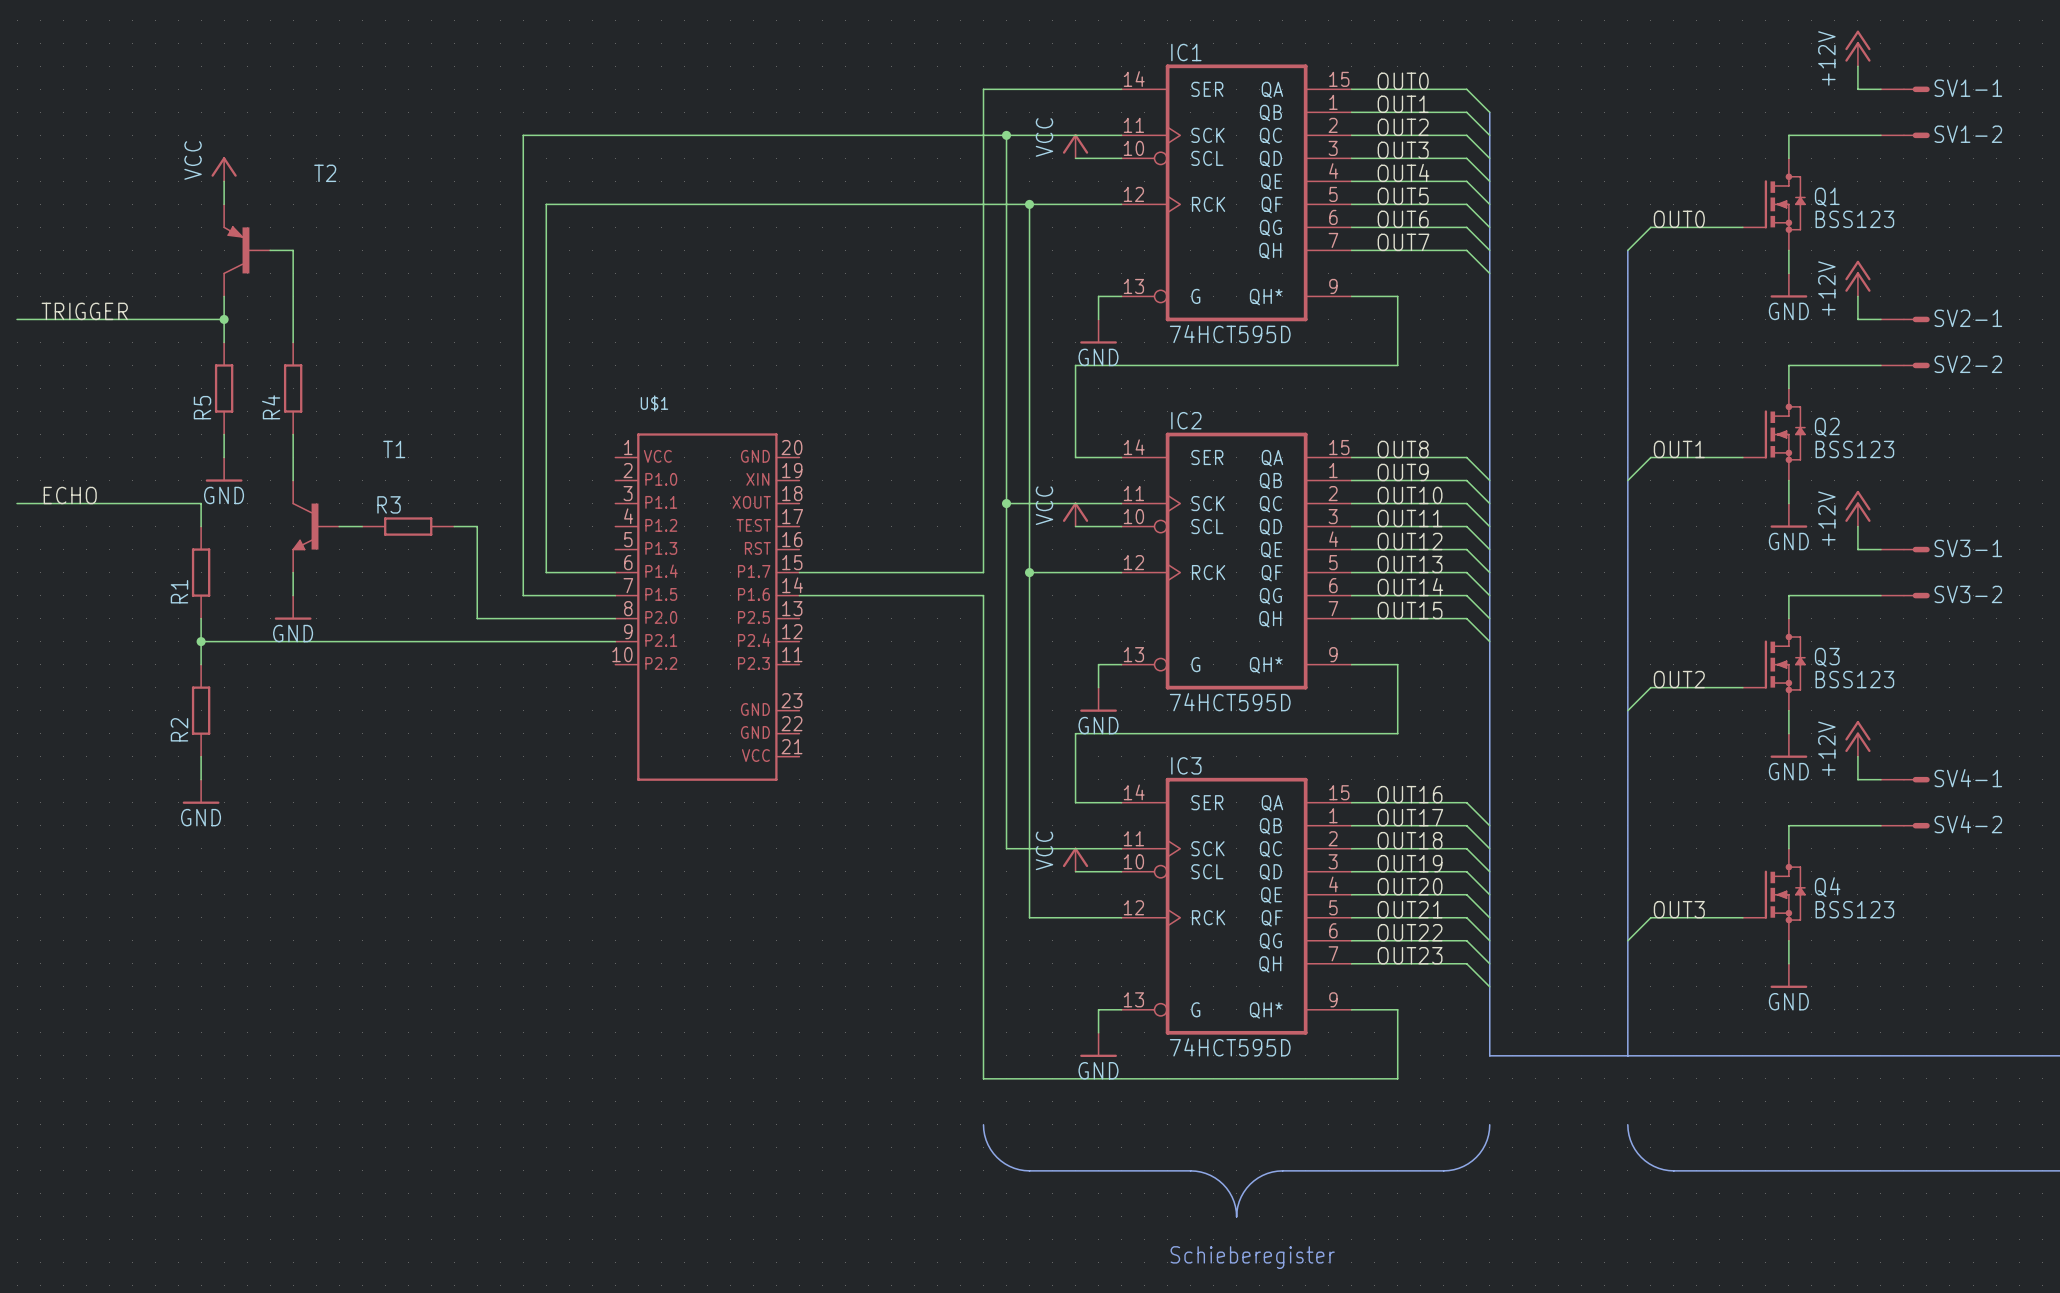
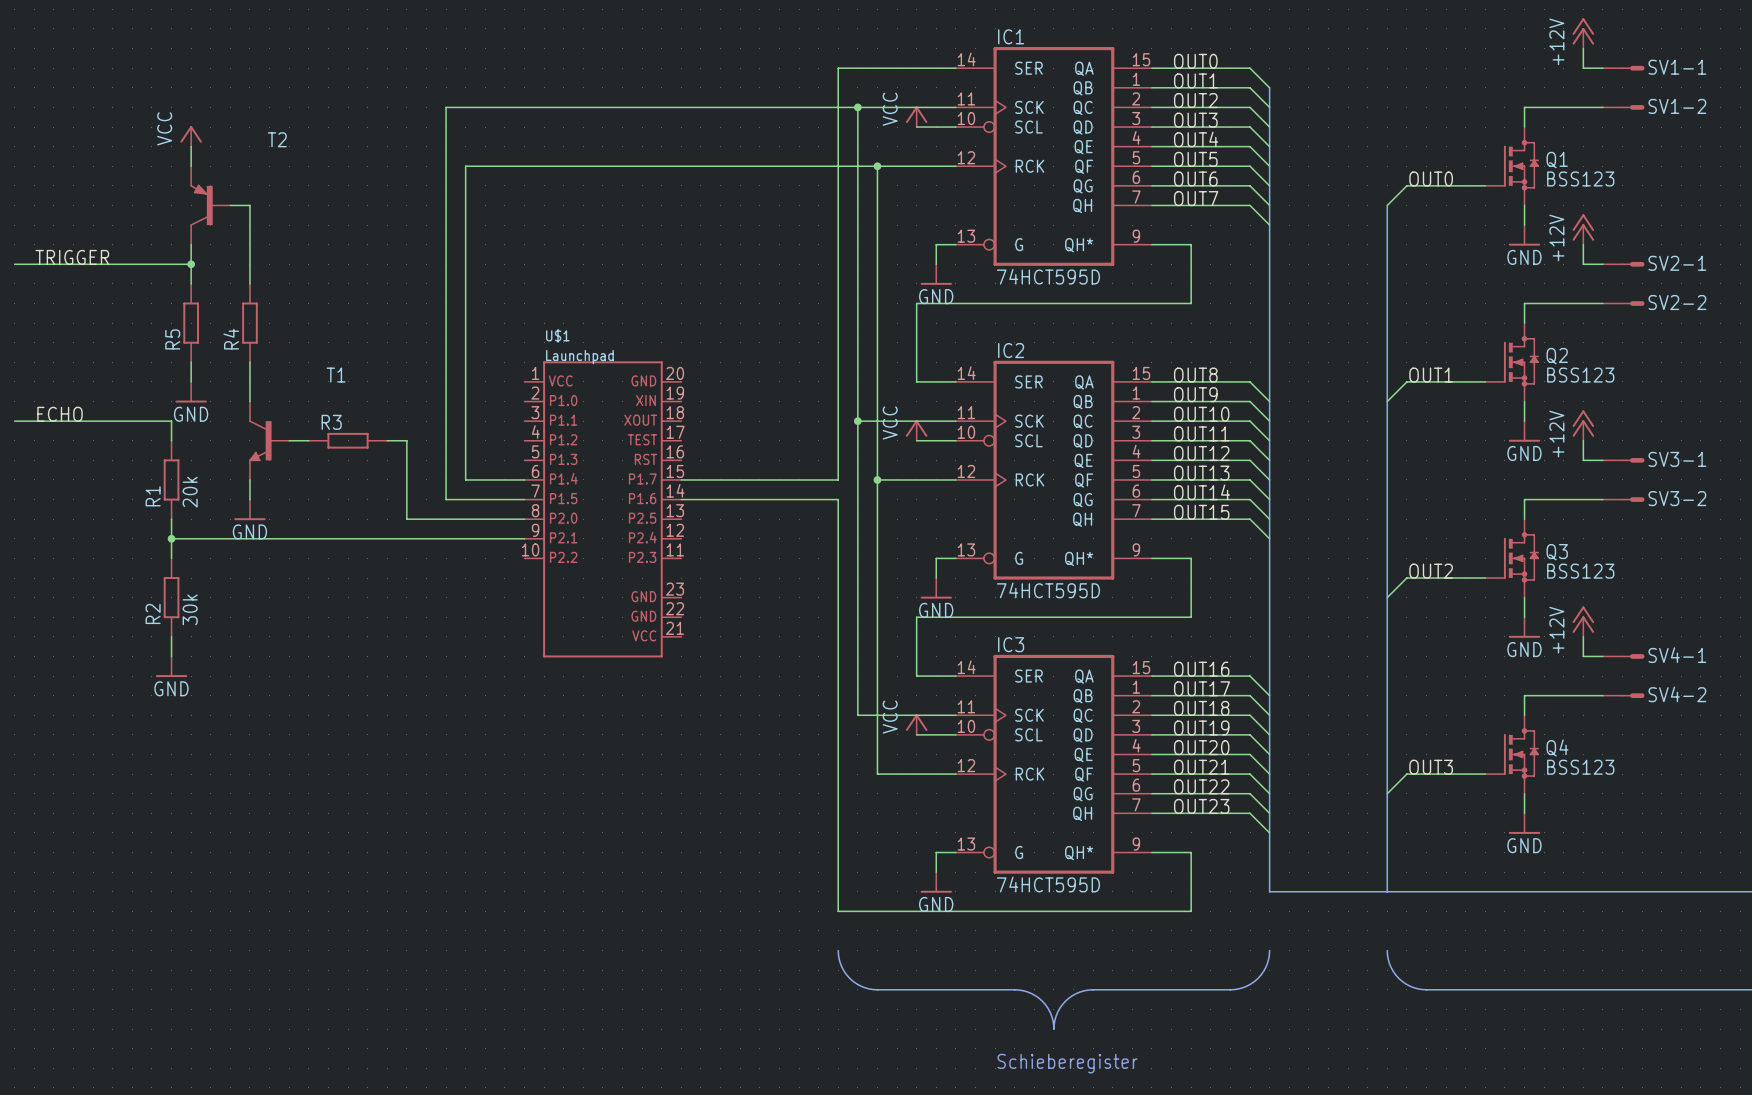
U$1 value: none -> Launchpad (579, 357)
R1 value: none -> 20k (190, 492)
R2 value: none -> 30k (190, 609)

